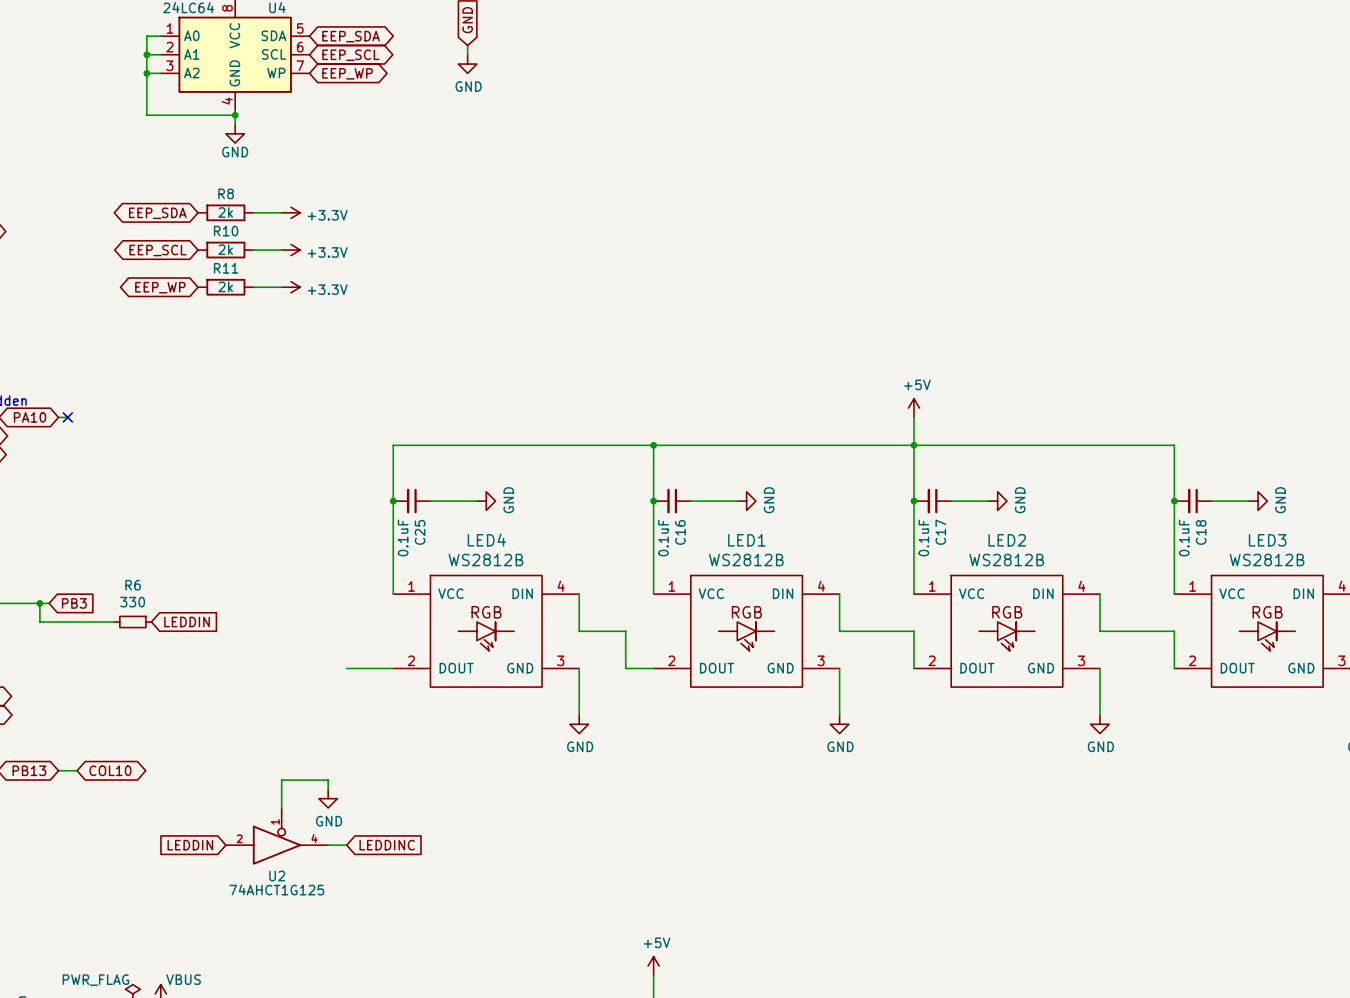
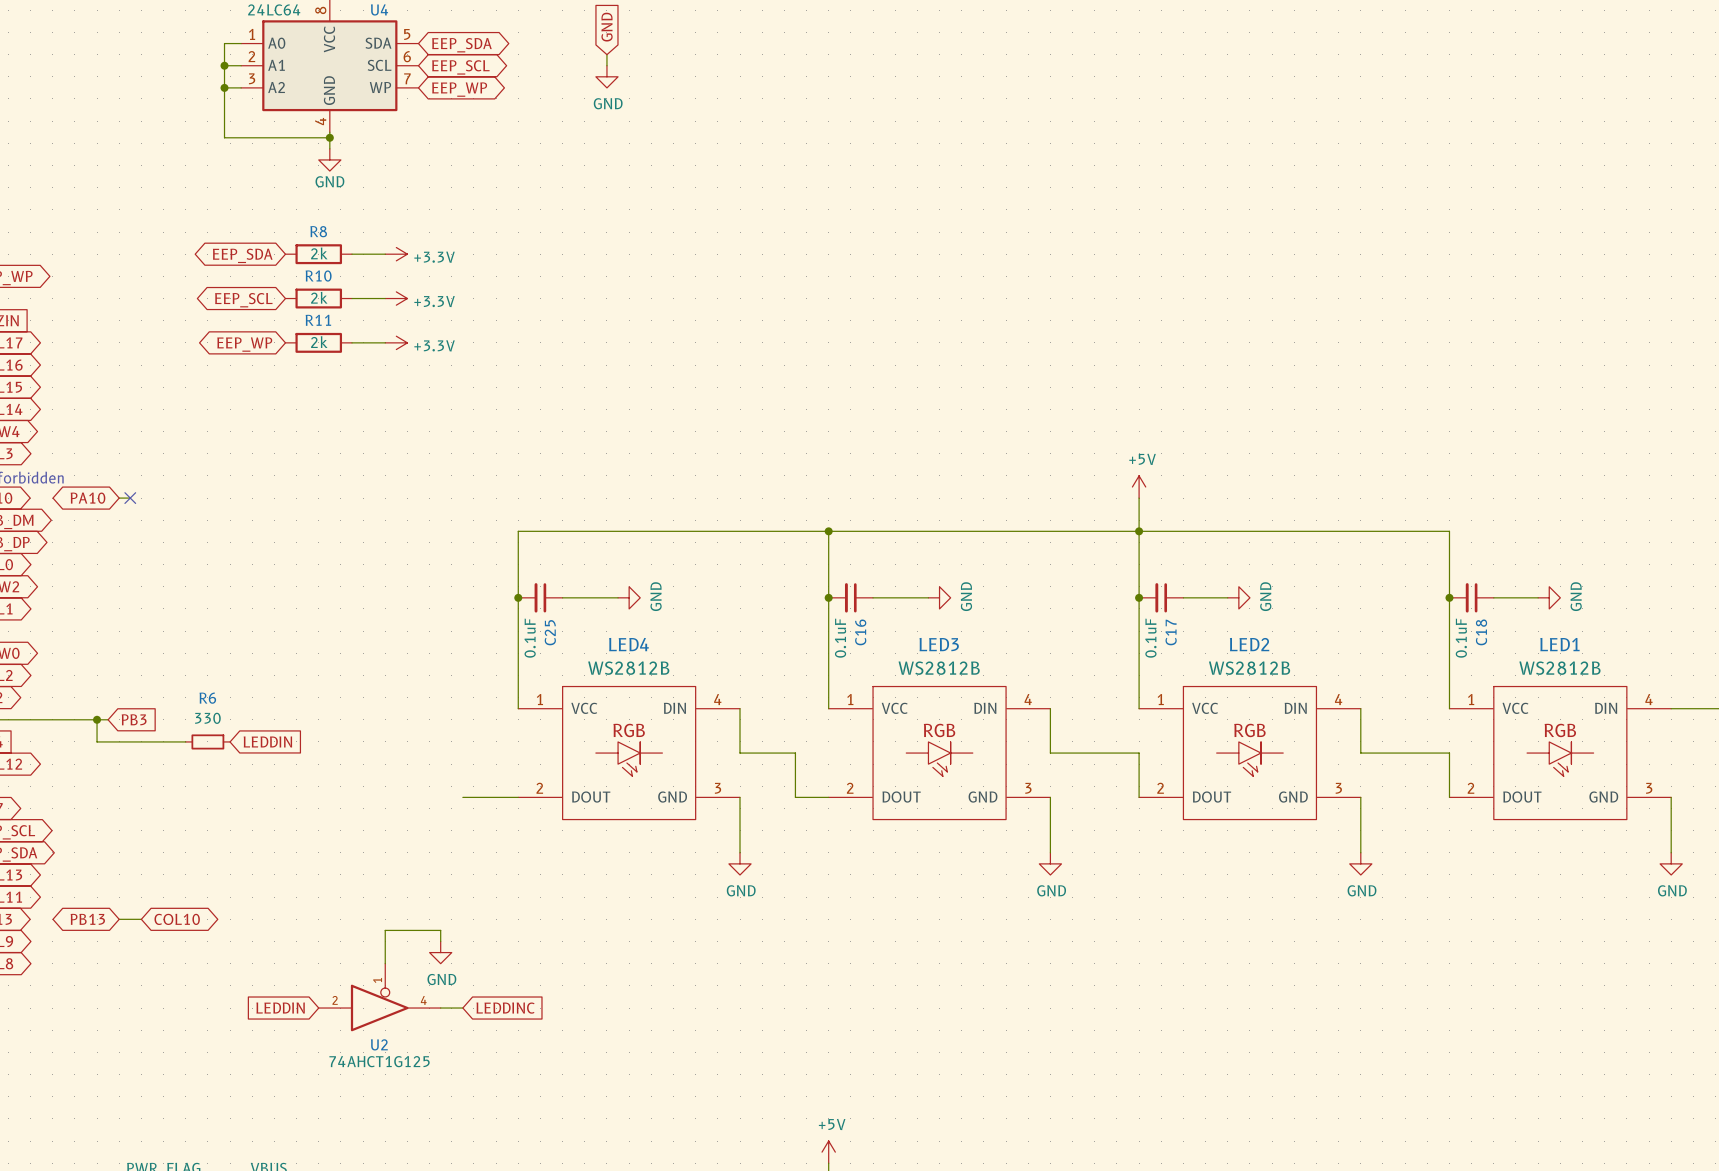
LED1 name: LED1 (746, 540) -> LED3 (939, 644)
LED3 name: LED3 (1267, 540) -> LED1 (1559, 644)

